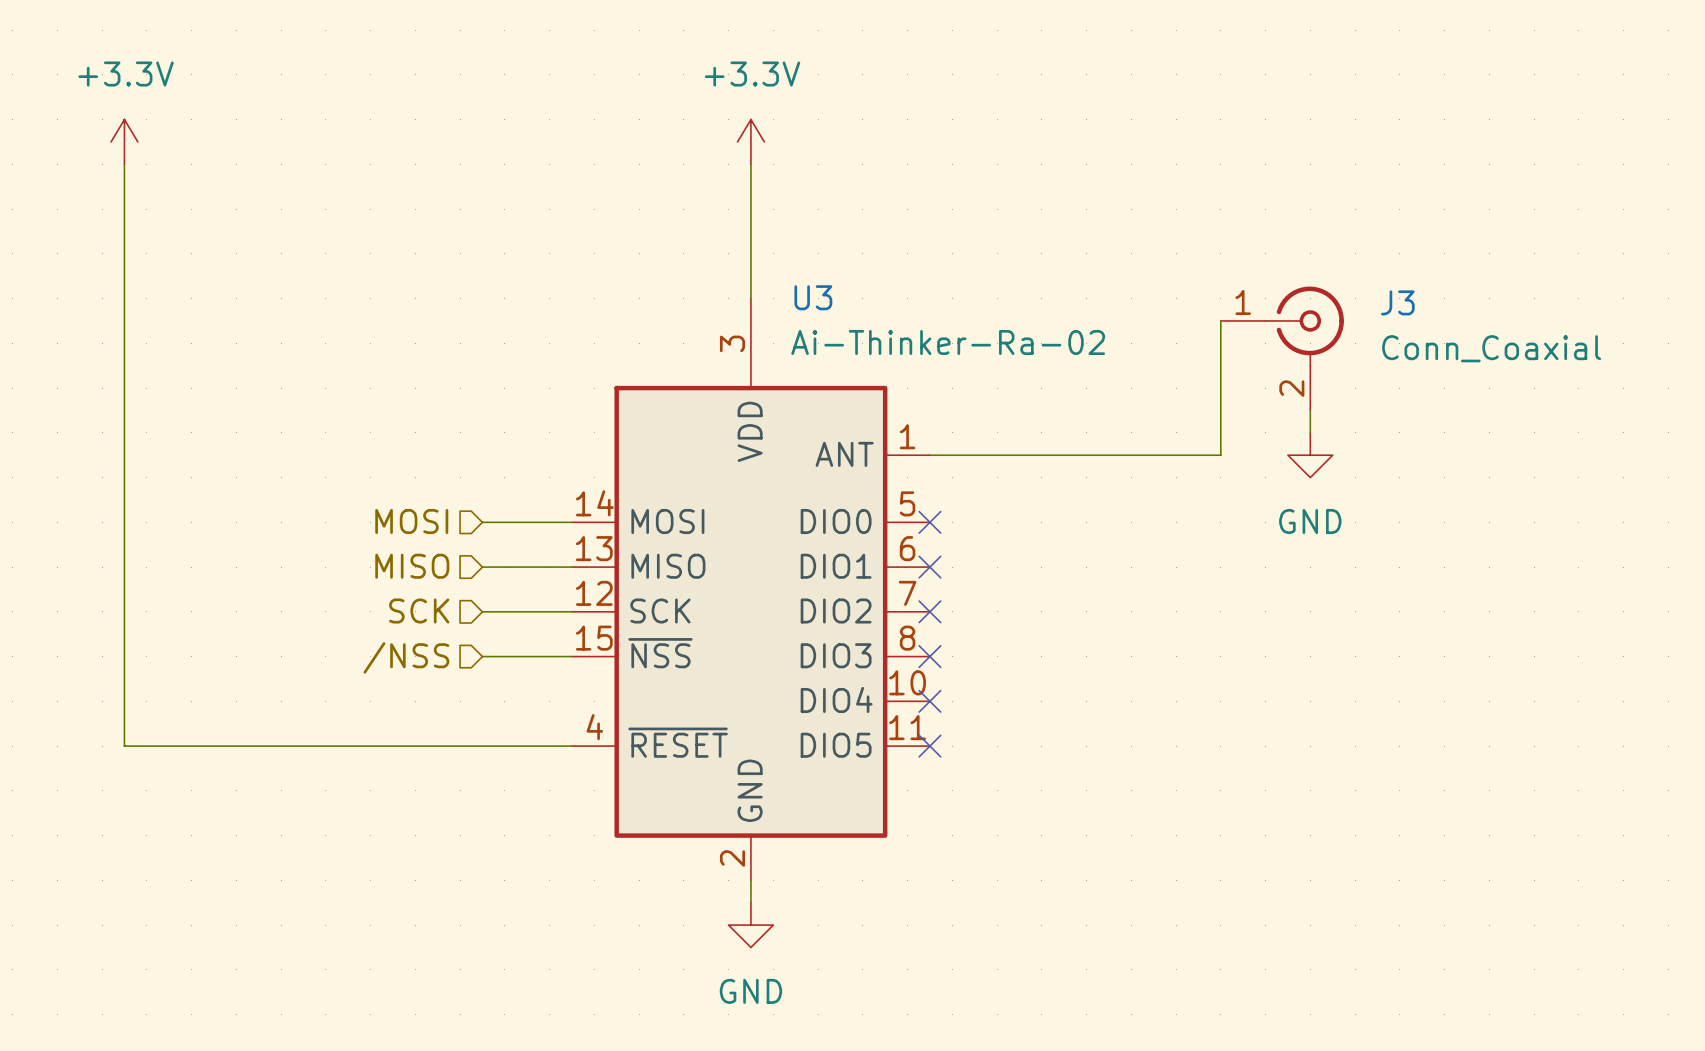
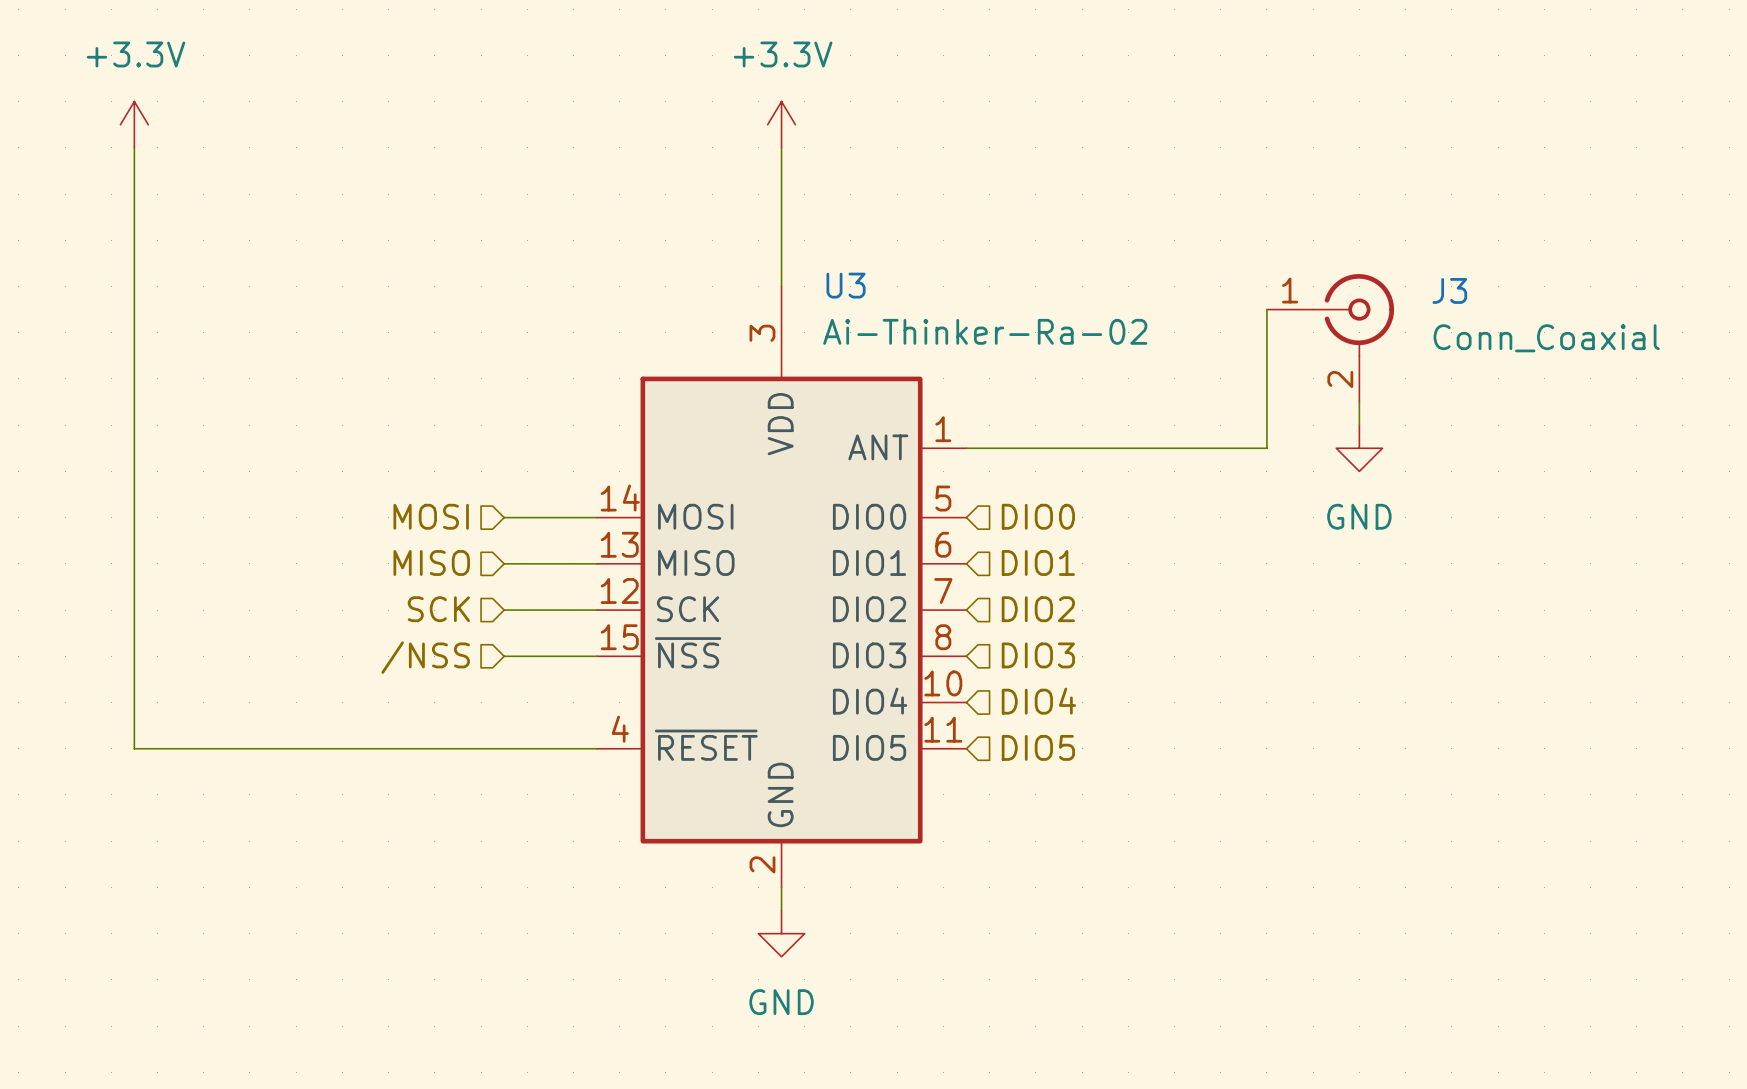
hierarchical label: none -> DIO0 (1038, 516)
no-connect mark: (929, 522) -> none
hierarchical label: none -> DIO1 (1038, 562)
no-connect mark: (929, 567) -> none
no-connect mark: (929, 611) -> none
hierarchical label: none -> DIO2 (1038, 609)
hierarchical label: none -> DIO3 (1038, 655)
no-connect mark: (929, 656) -> none
hierarchical label: none -> DIO4 (1038, 701)
no-connect mark: (929, 701) -> none
hierarchical label: none -> DIO5 (1038, 747)
no-connect mark: (929, 746) -> none

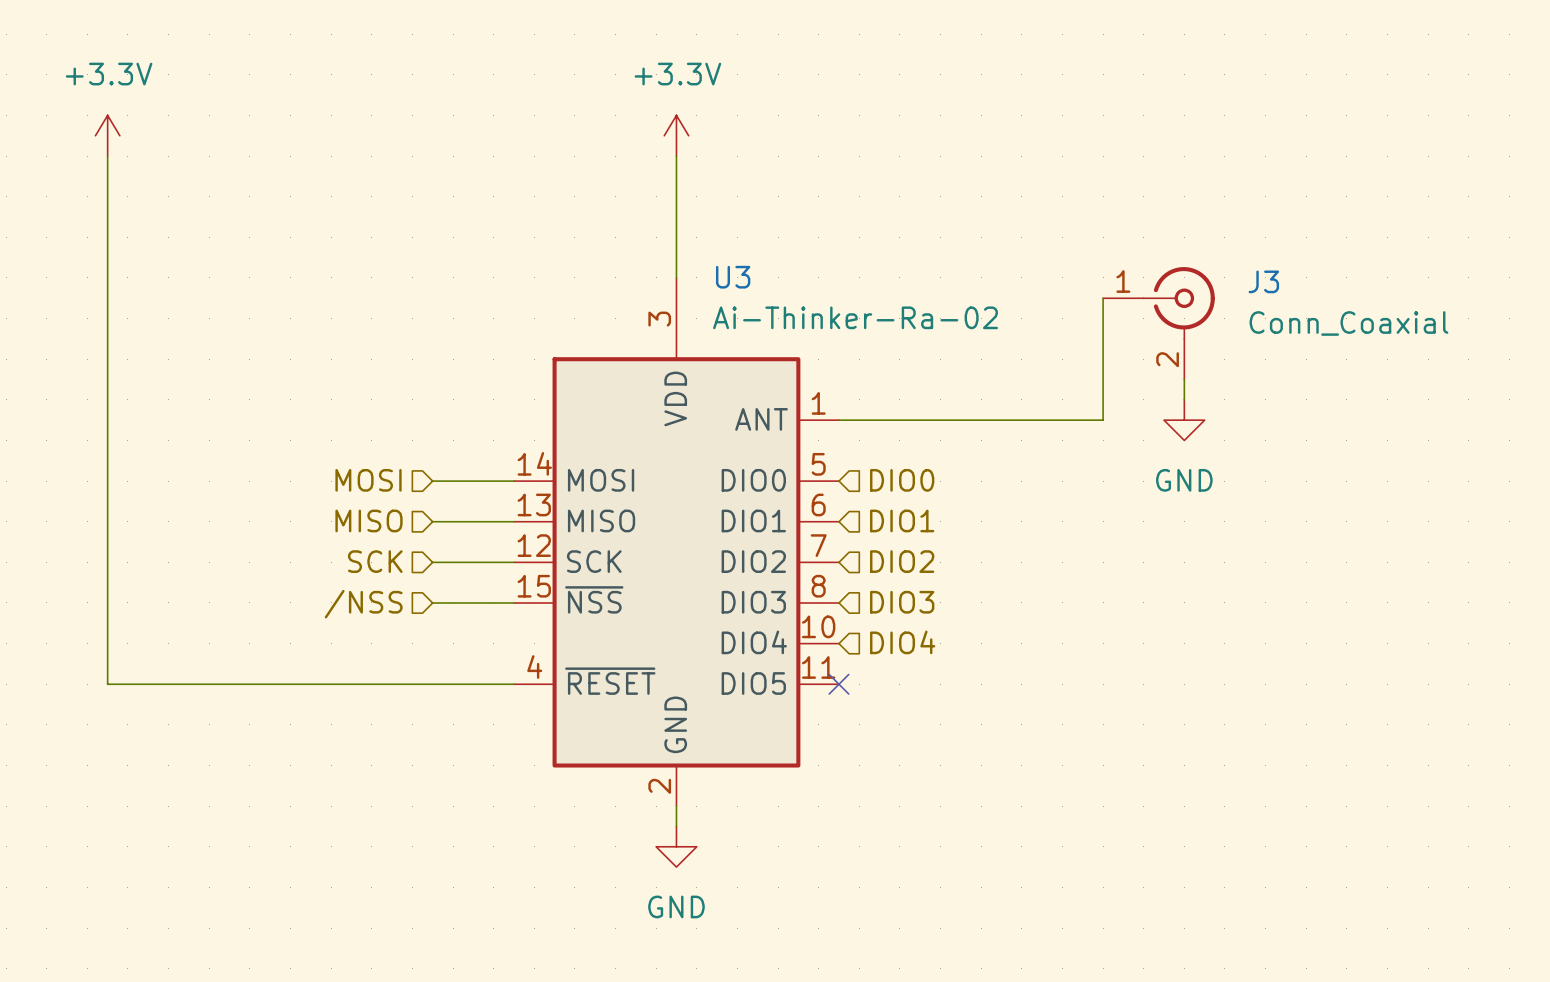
hierarchical label: DIO5 (1038, 747) -> none
no-connect mark: none -> (838, 684)

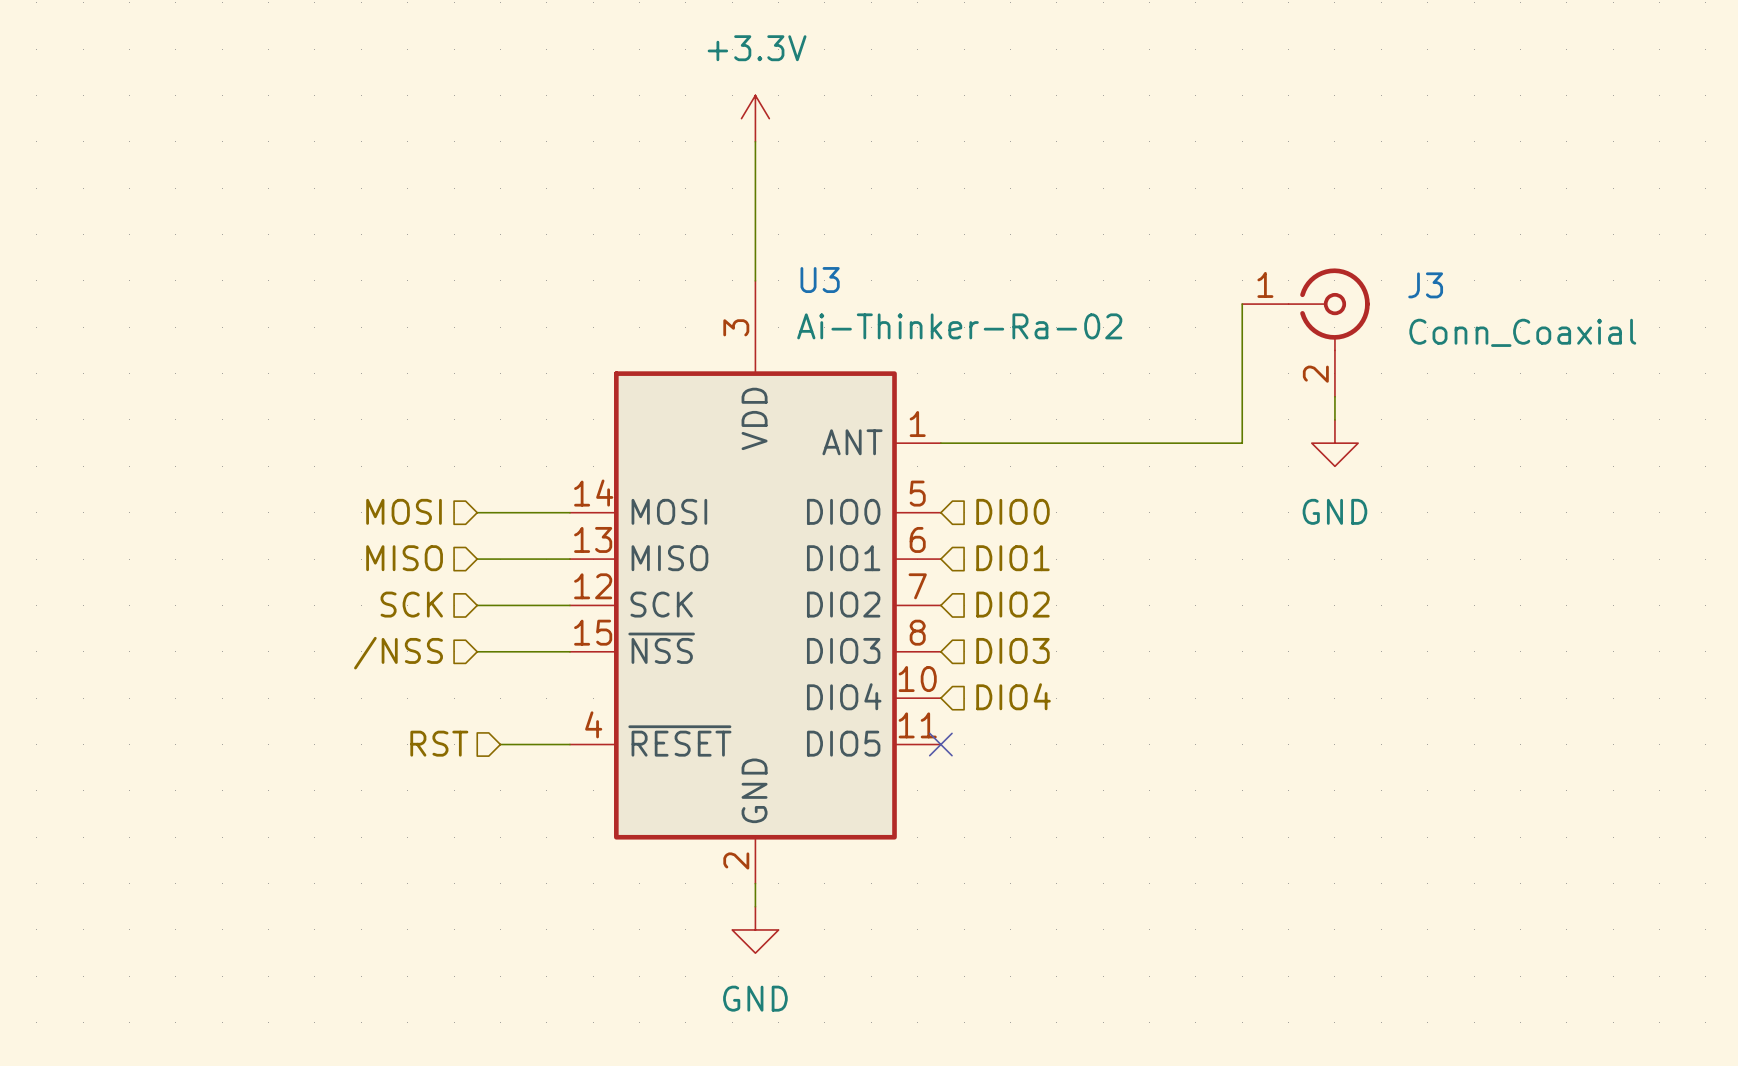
power symbol: +3.3V (107, 135) -> none
wire: (107, 156) (107, 684) (453, 684) -> none
hierarchical label: none -> RST (439, 743)

